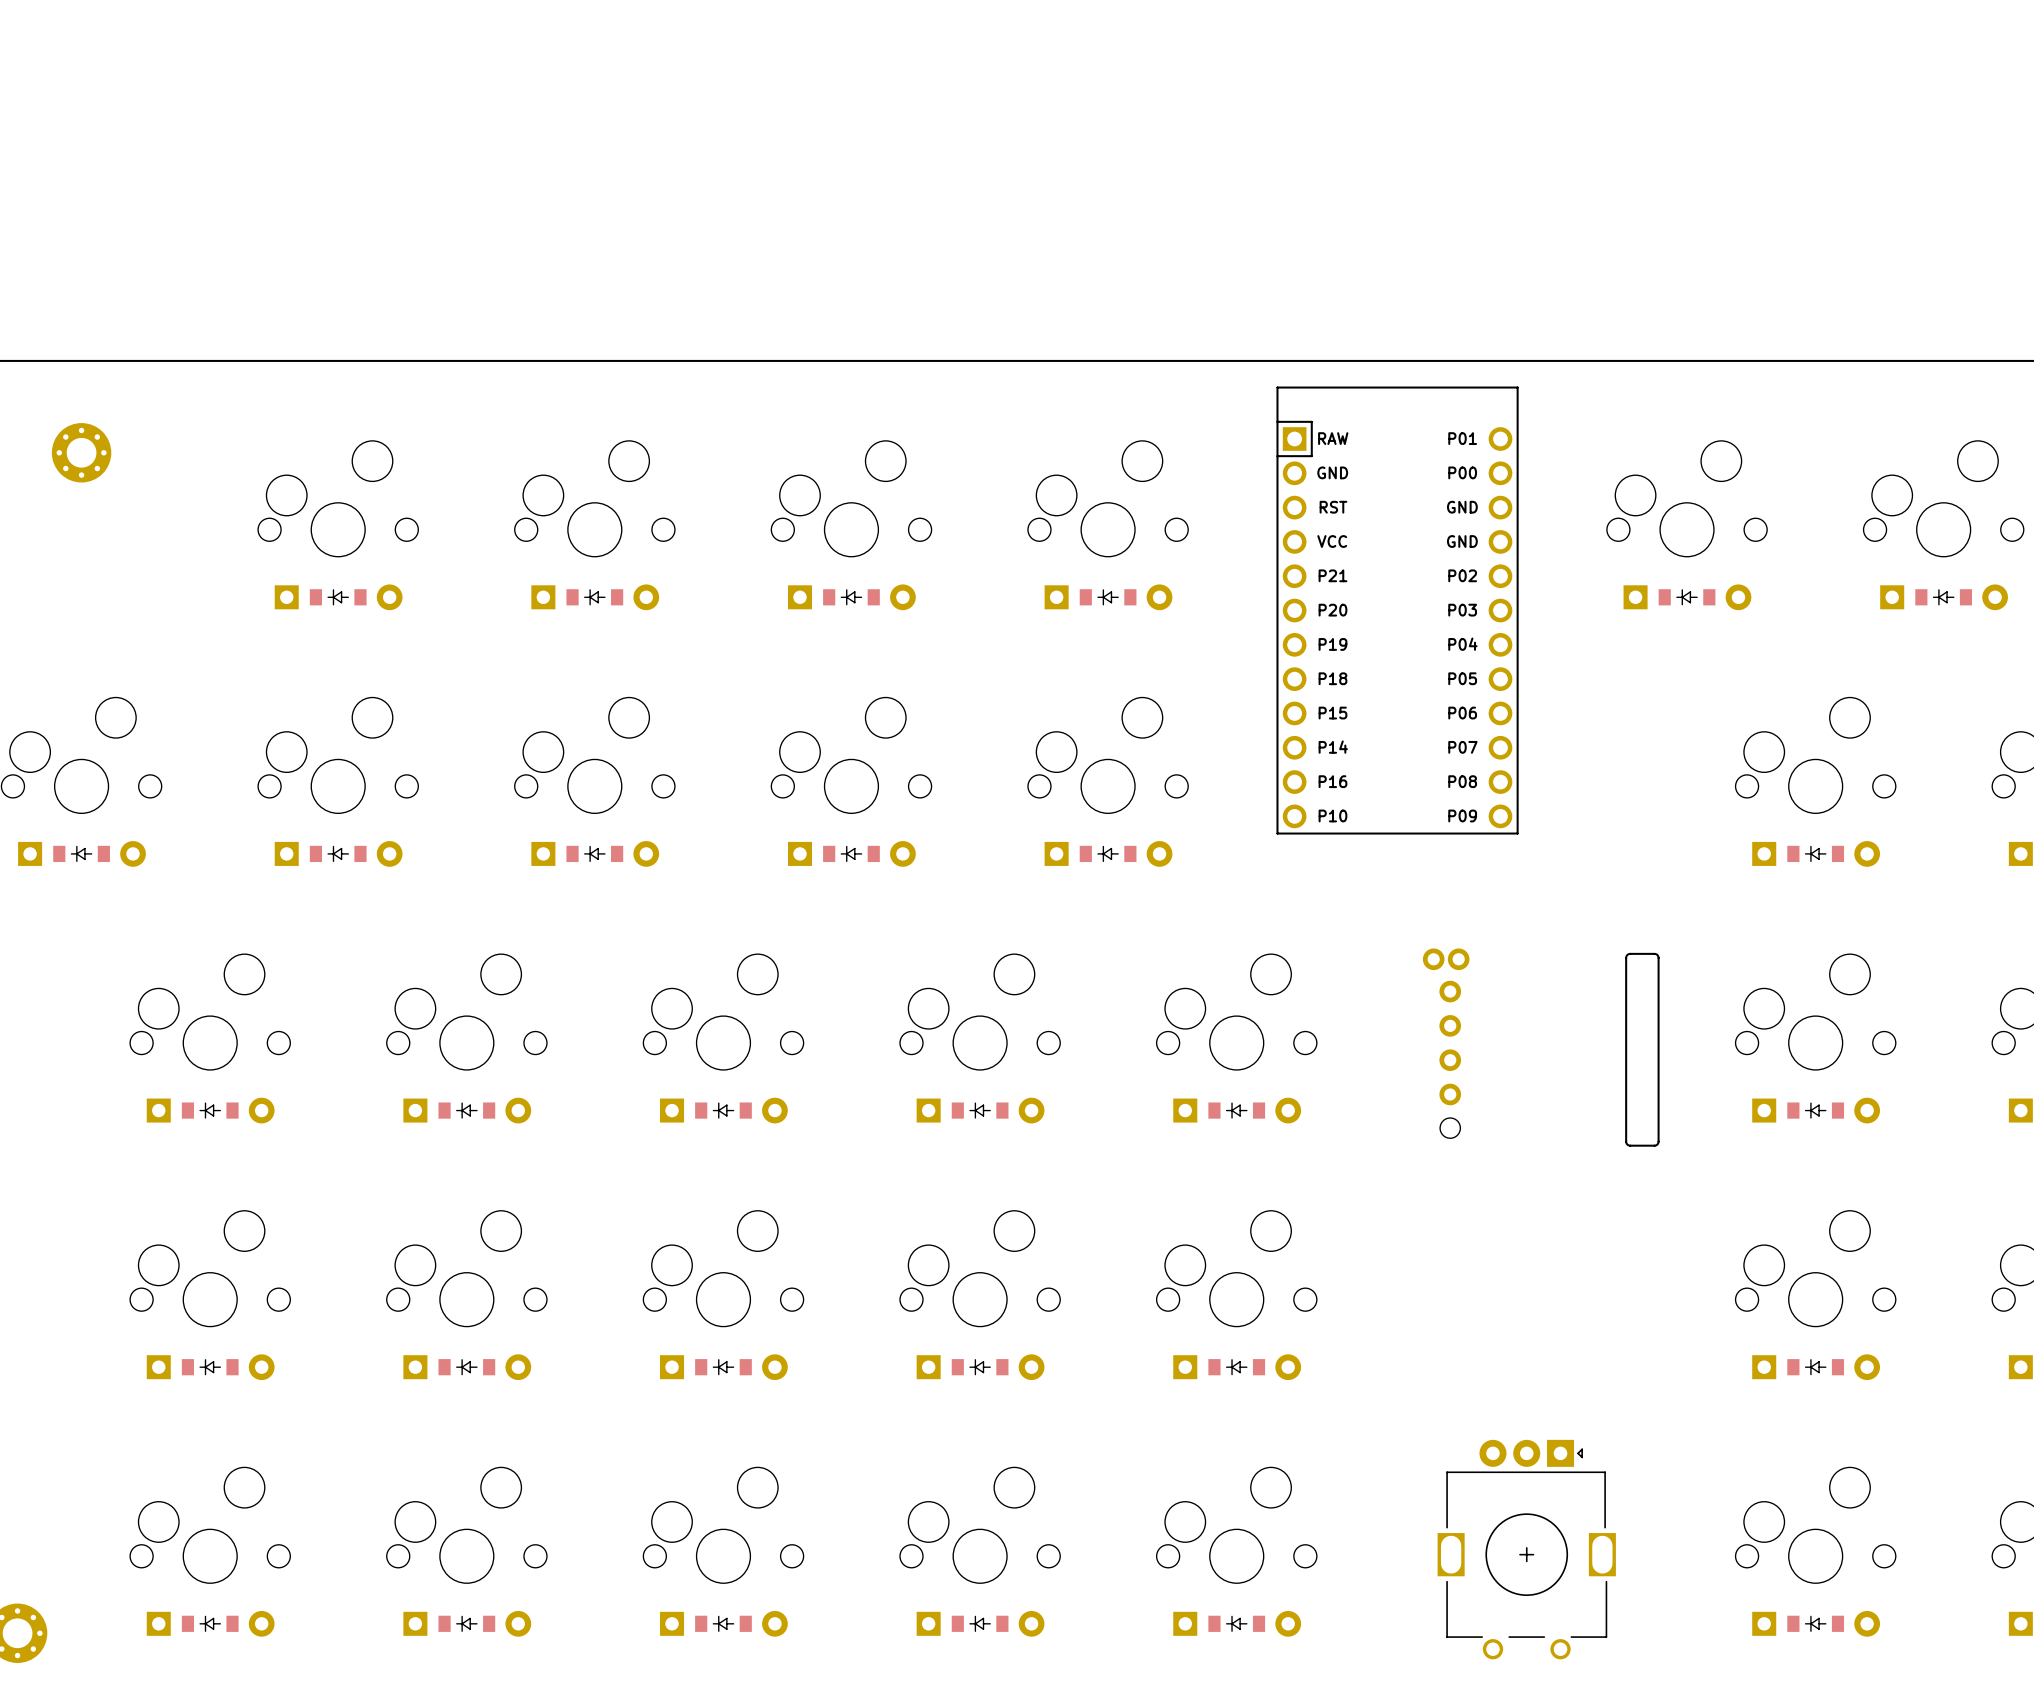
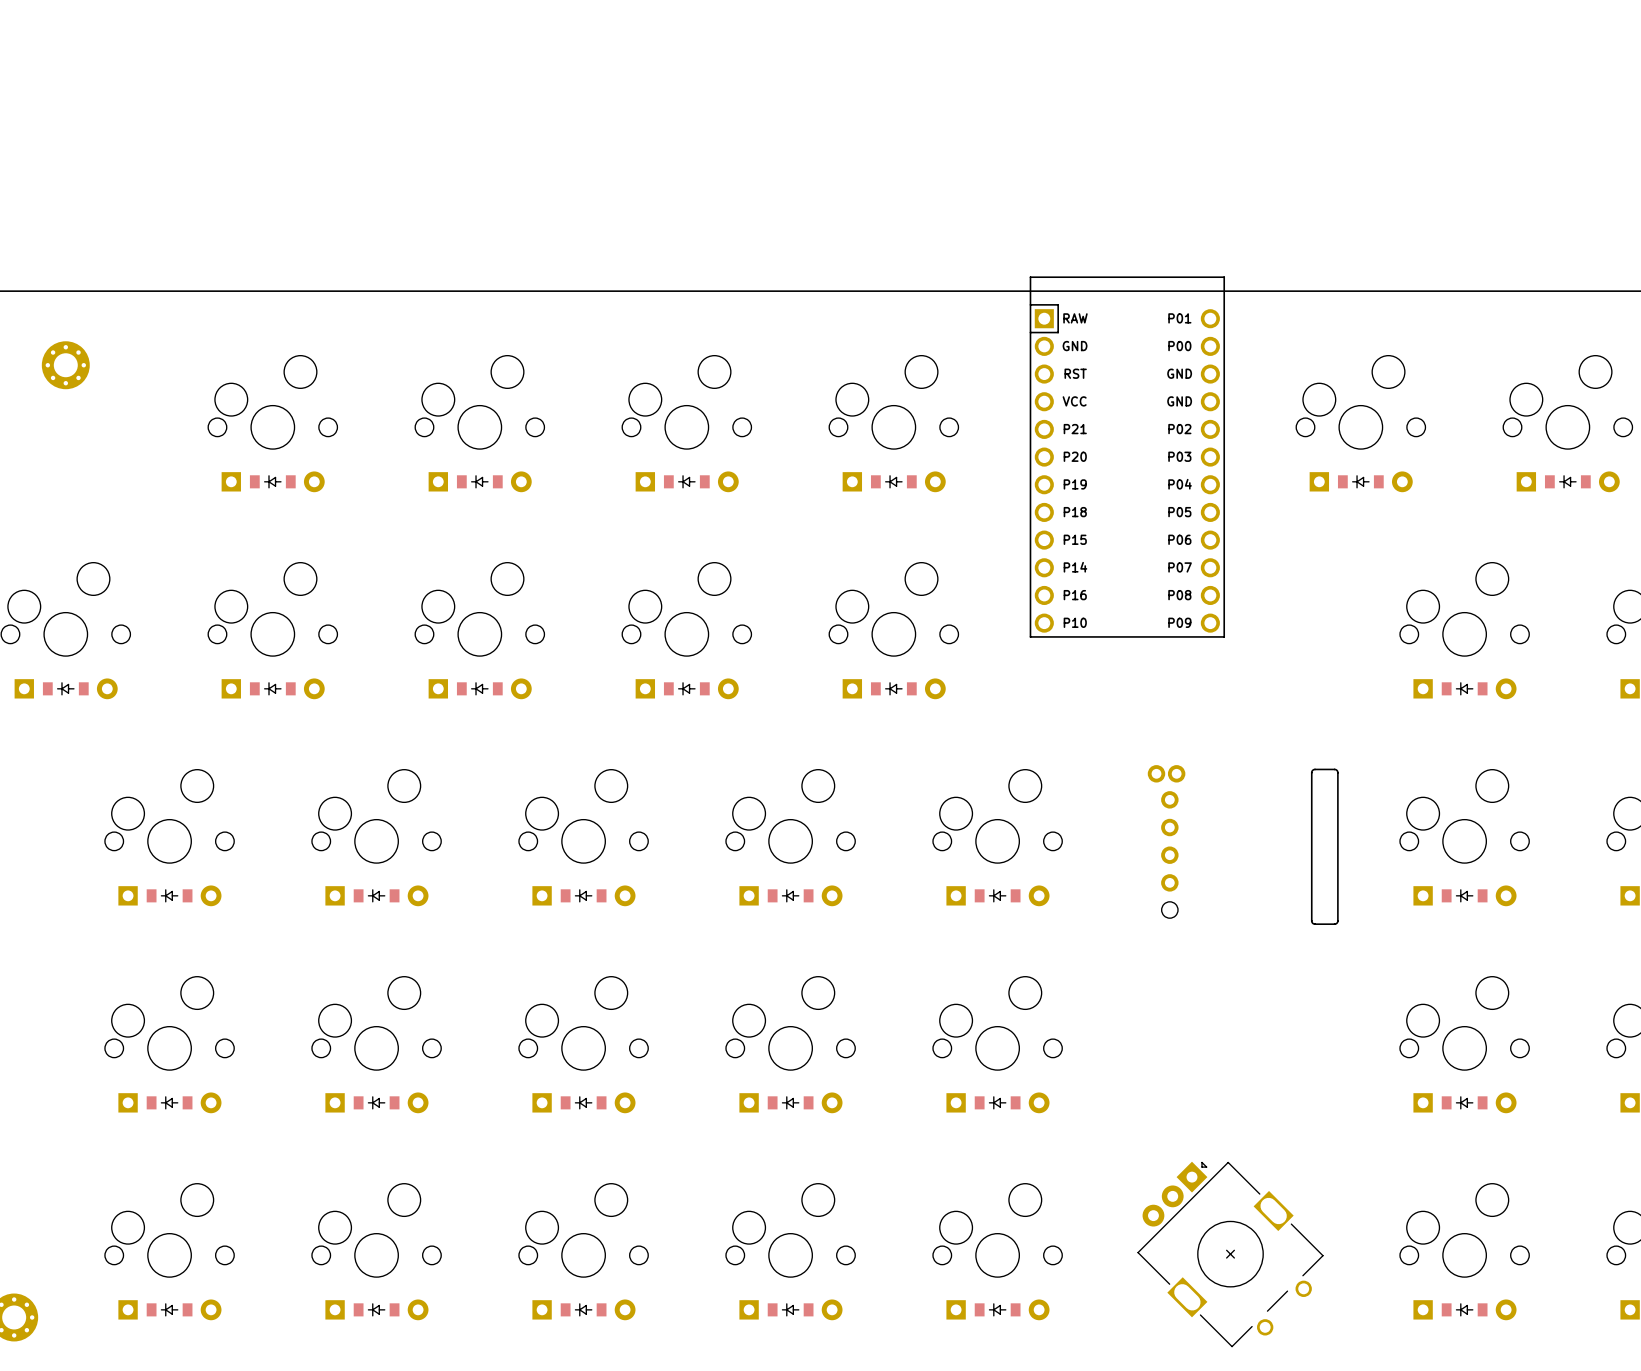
part position: (1397, 610) -> (1127, 457)
part rotation: 0° (1526, 1549) -> 45° counterclockwise (1230, 1254)

